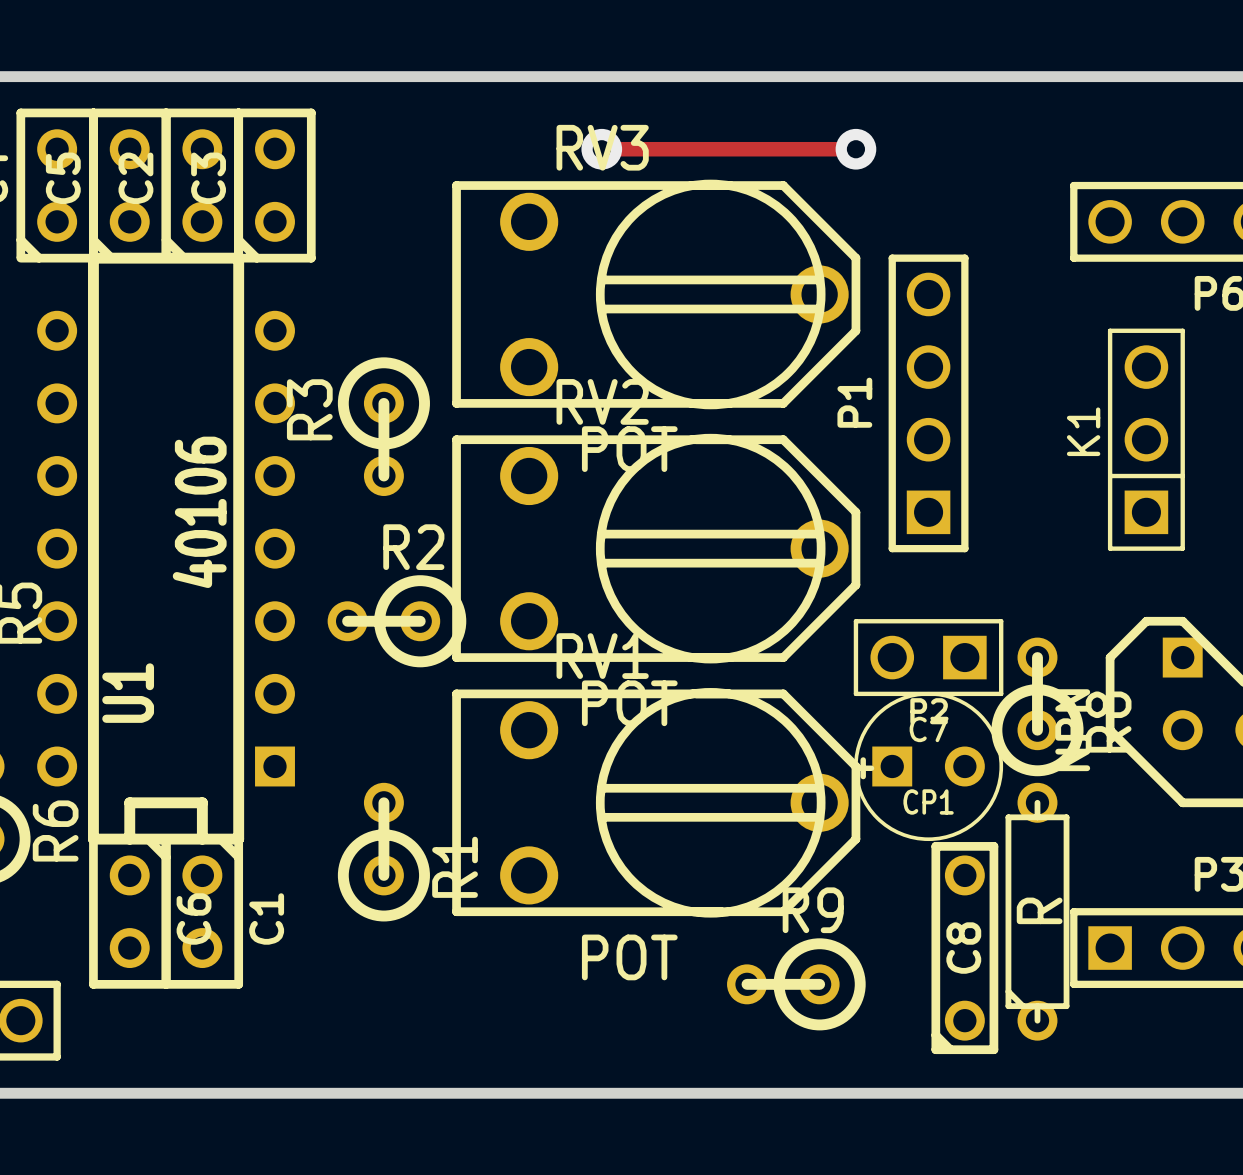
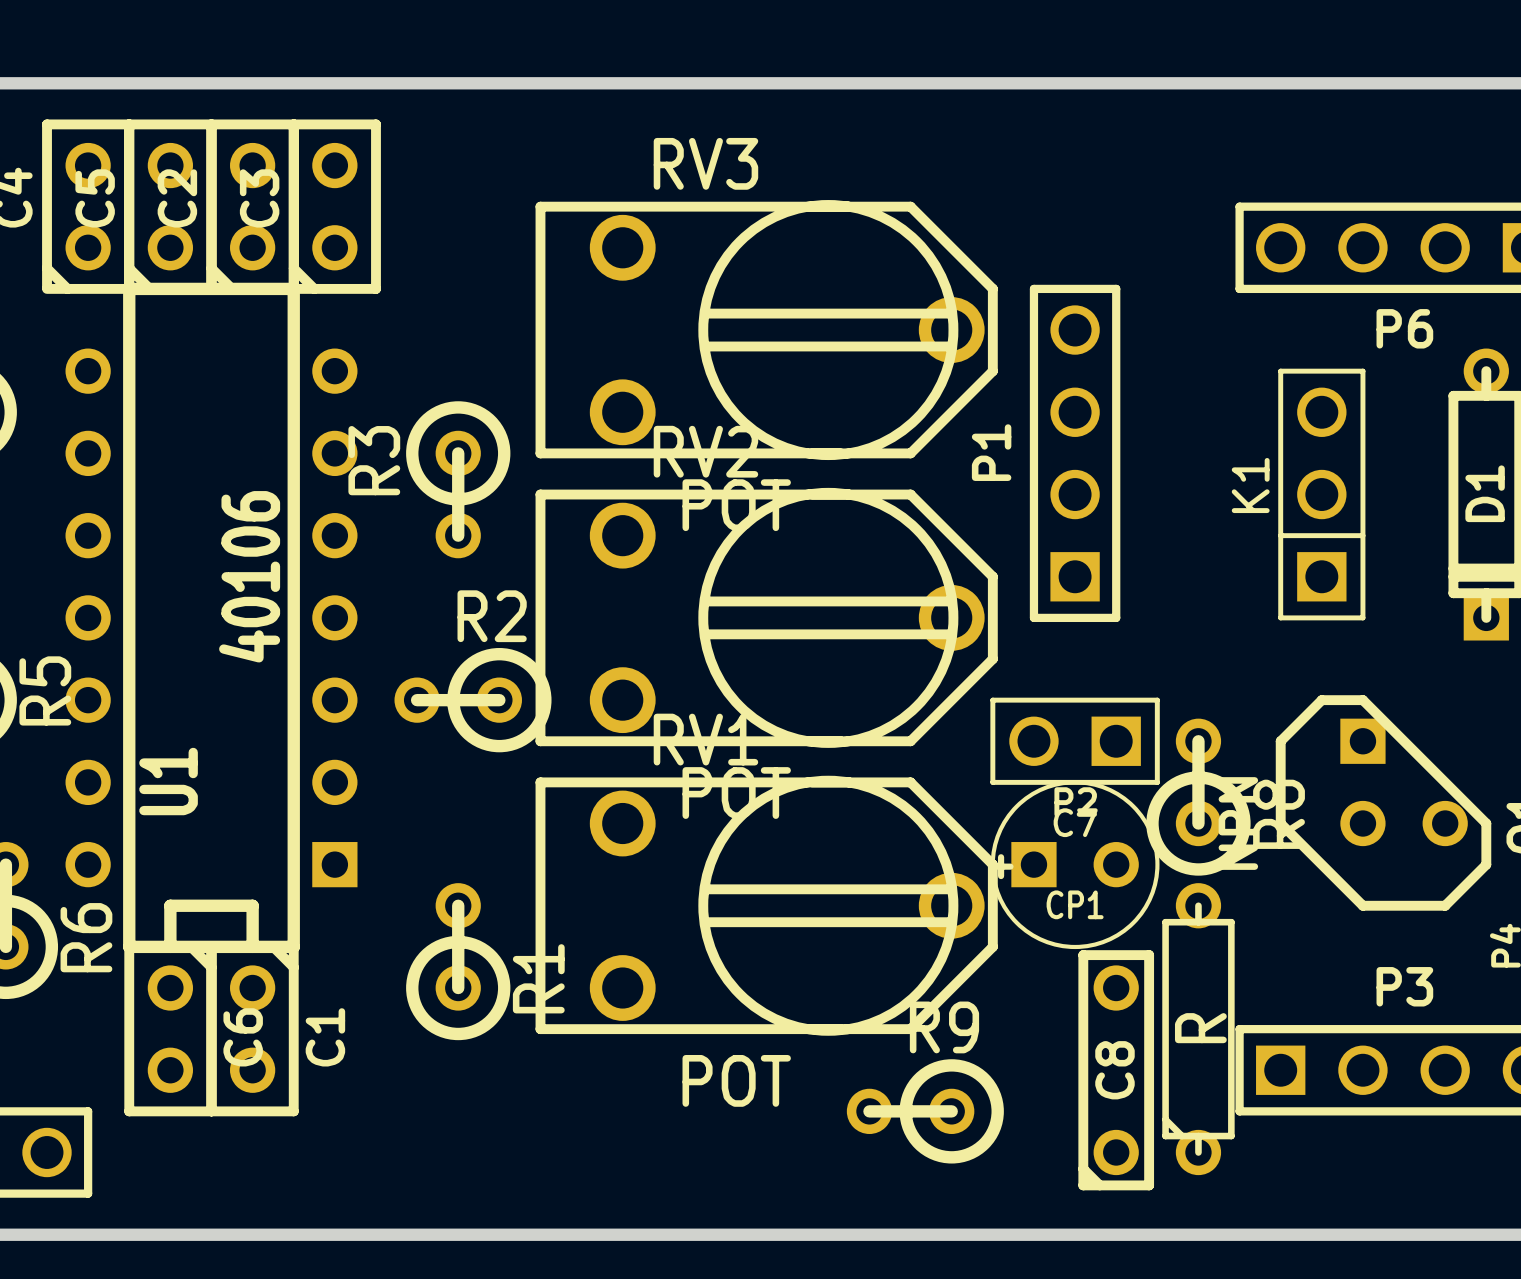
track: (601, 149) (855, 149) -> none
via: (601, 149) -> none
via: (855, 149) -> none

